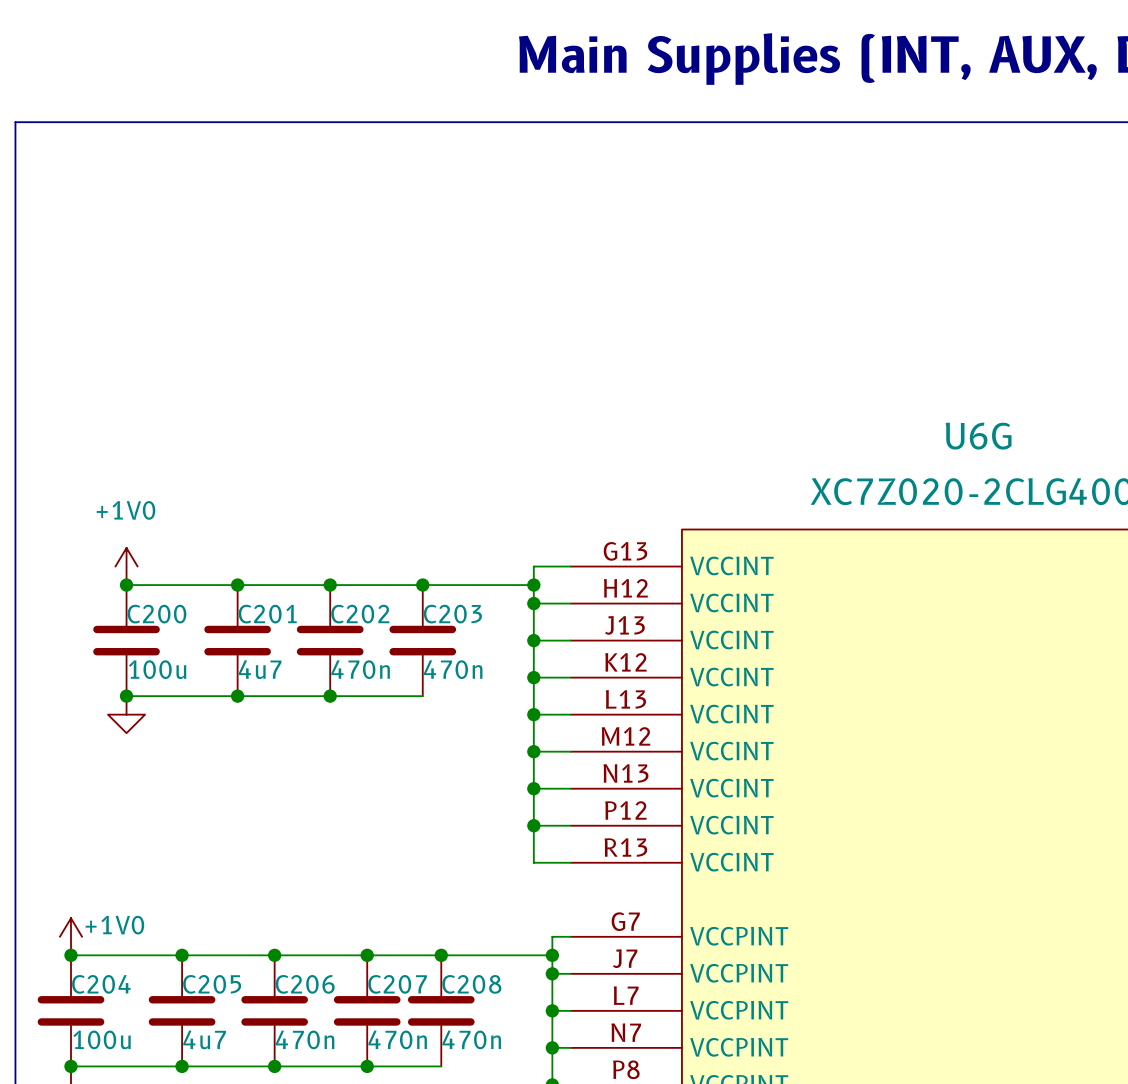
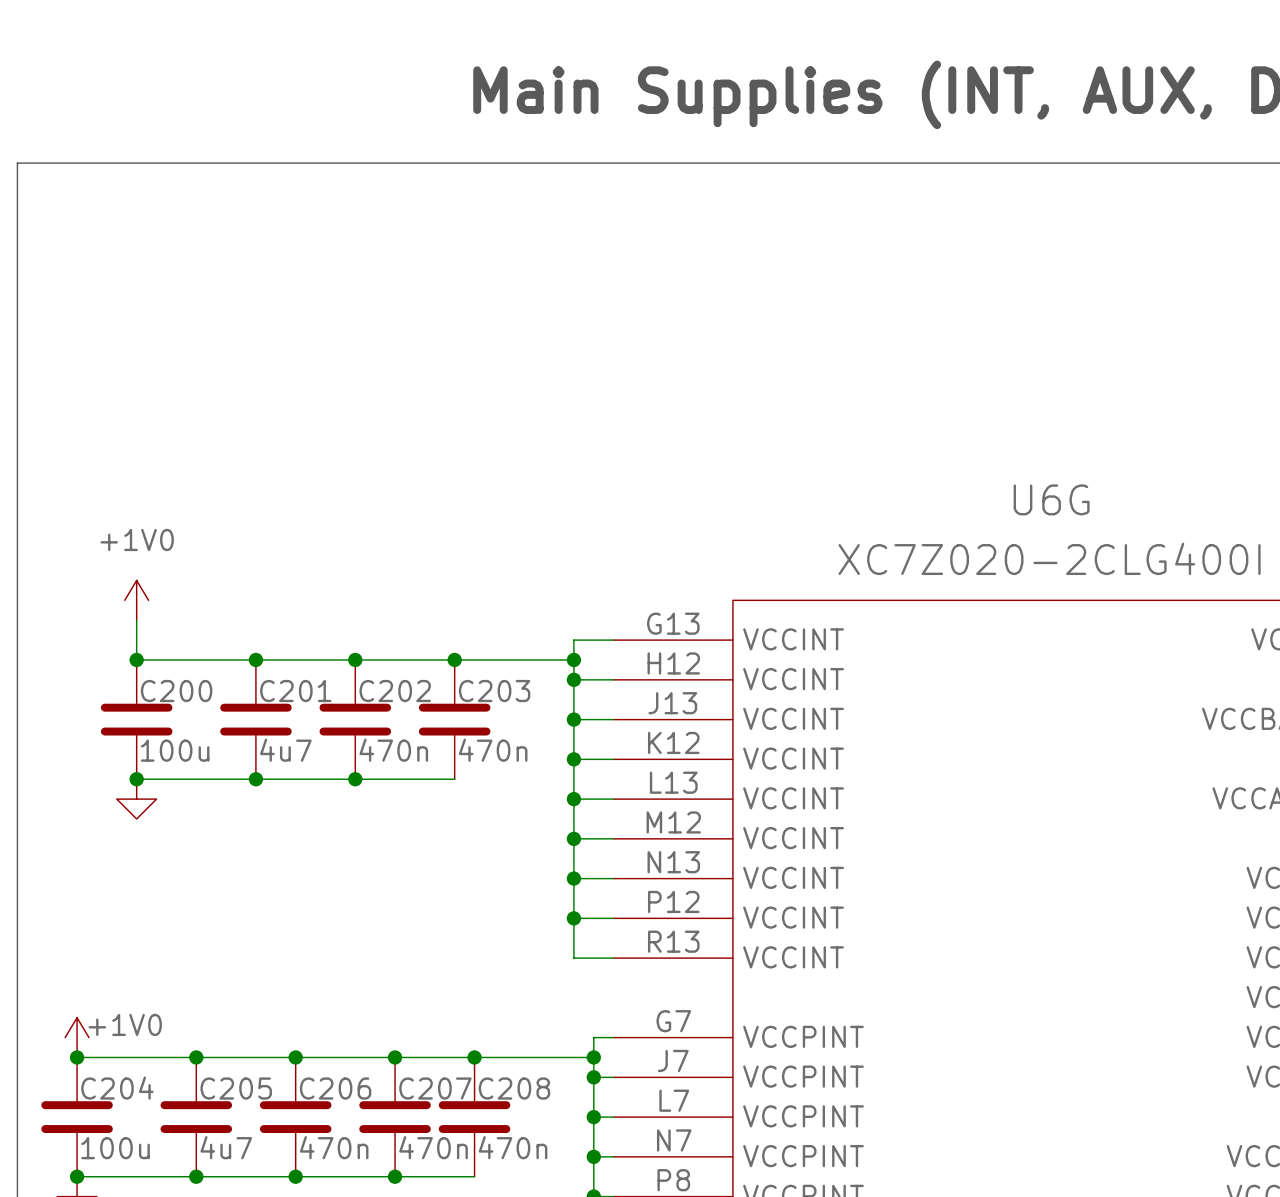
power symbol position: +1V0 (126, 566) -> +1V0 (136, 600)

